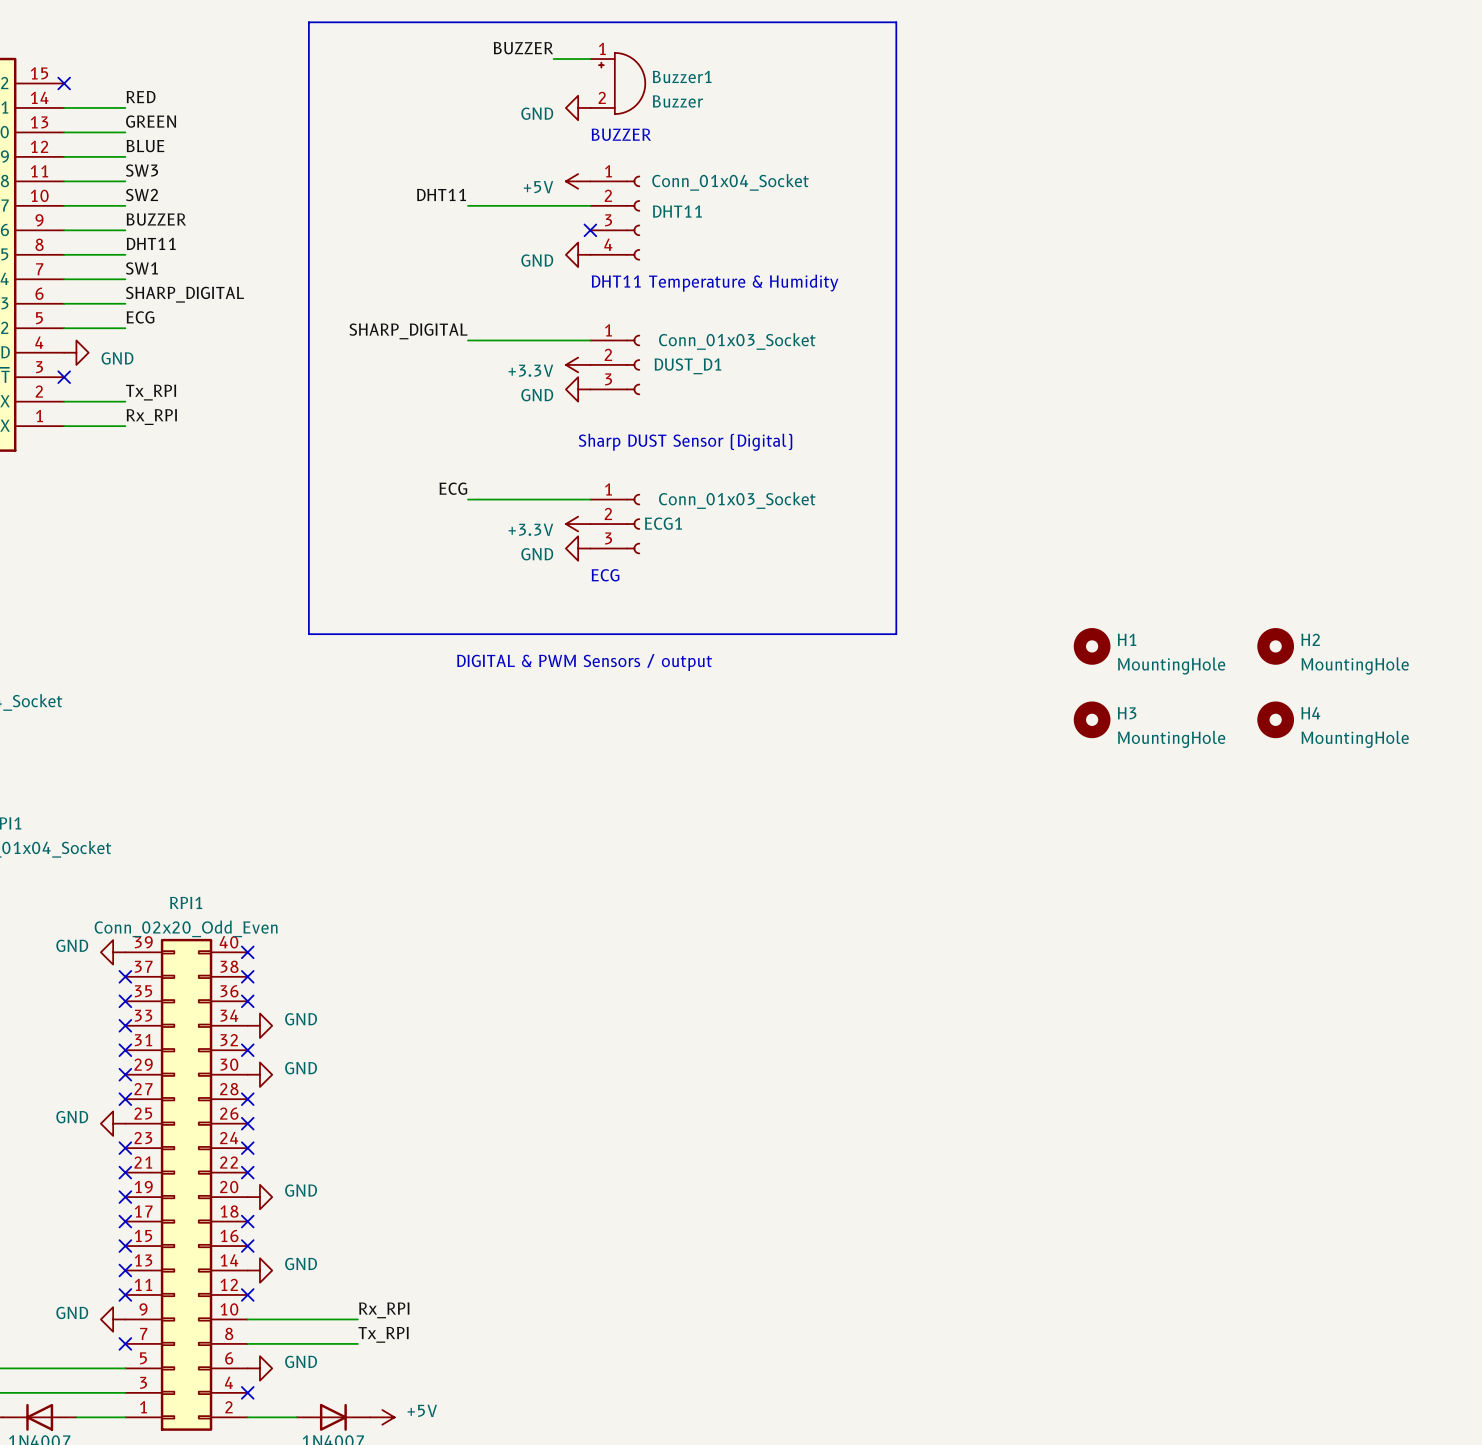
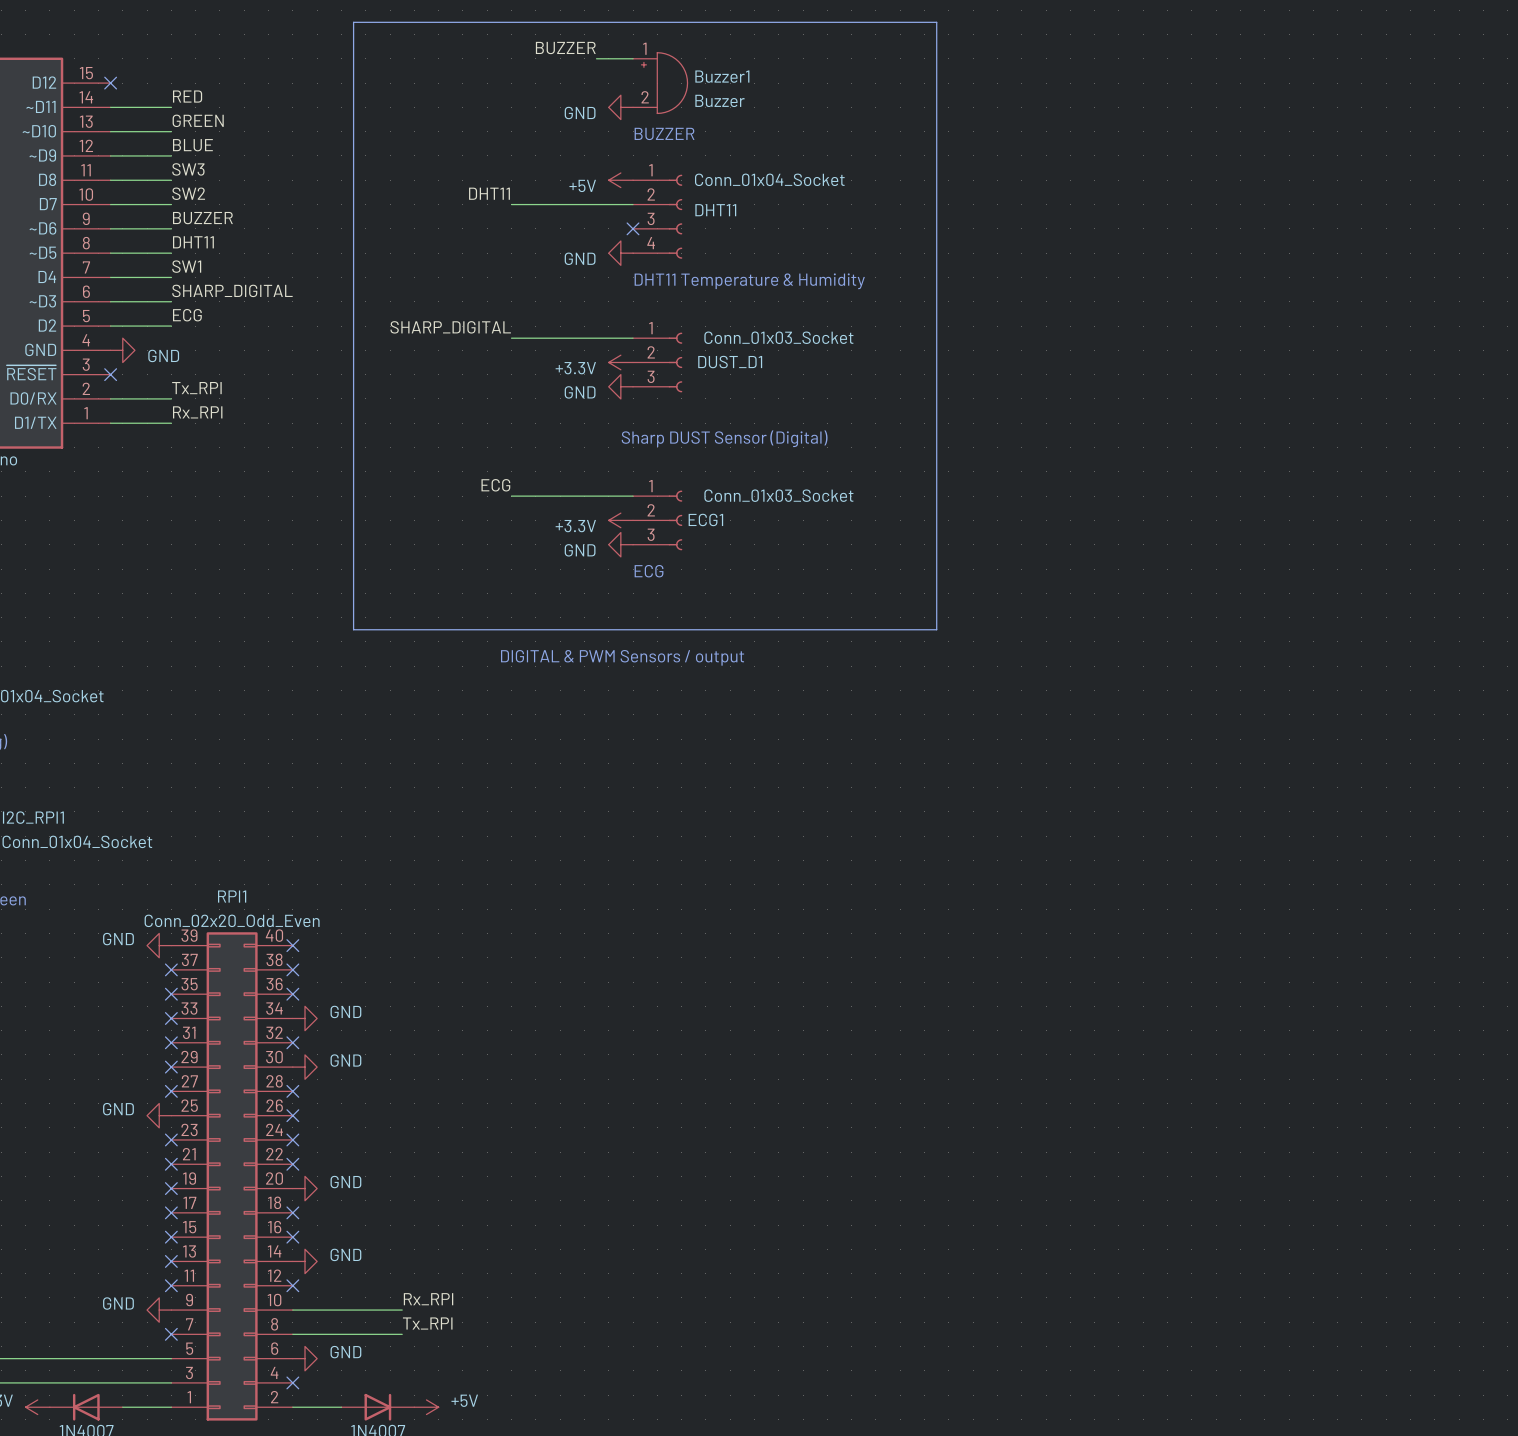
H1: MountingHole (1092, 646) -> none
H2: MountingHole (1275, 646) -> none
H3: MountingHole (1092, 719) -> none
H4: MountingHole (1275, 719) -> none

